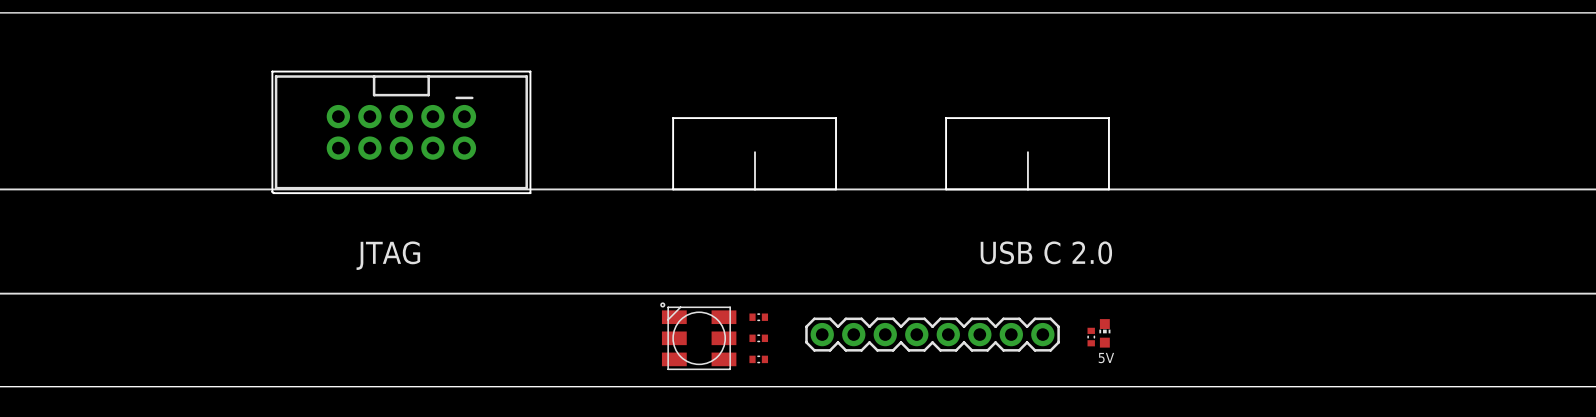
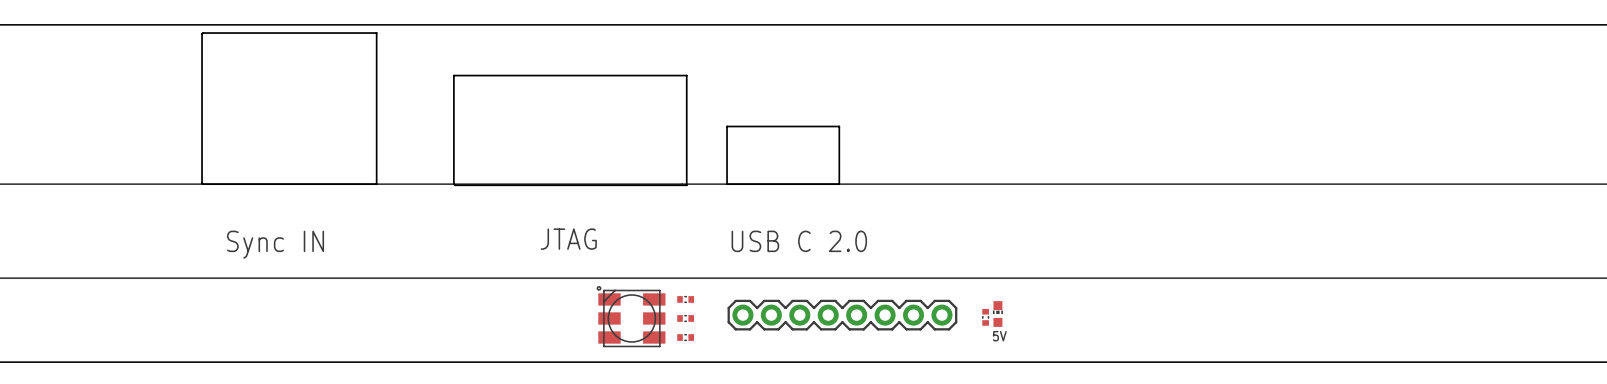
board edge: none -> (203, 33) (376, 33) (376, 184) (203, 184) (203, 33)
board edge: (272, 71) (530, 71) (530, 193) (273, 193) (272, 71) -> (453, 75) (686, 75) (686, 185) (455, 185) (453, 75)
board edge: (946, 118) (1108, 118) (1108, 189) (946, 189) (946, 118) -> none
part: (401, 132) -> none
line: (755, 152) (755, 189) -> none
line: (1027, 152) (1027, 189) -> none
board edge: (804, 189) (673, 189) (673, 118) (836, 118) (836, 189) -> (727, 184) (727, 126) (839, 126) (839, 184) (755, 184)
text position: USB C 2.0 (1046, 252) -> USB C 2.0 (799, 241)
text: none -> Sync IN (275, 244)
text position: JTAG (388, 255) -> JTAG (568, 239)

